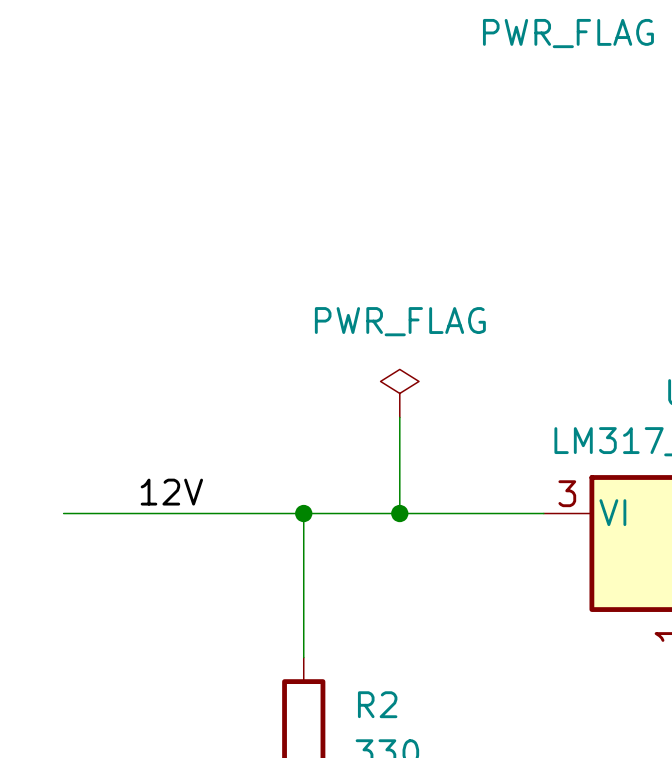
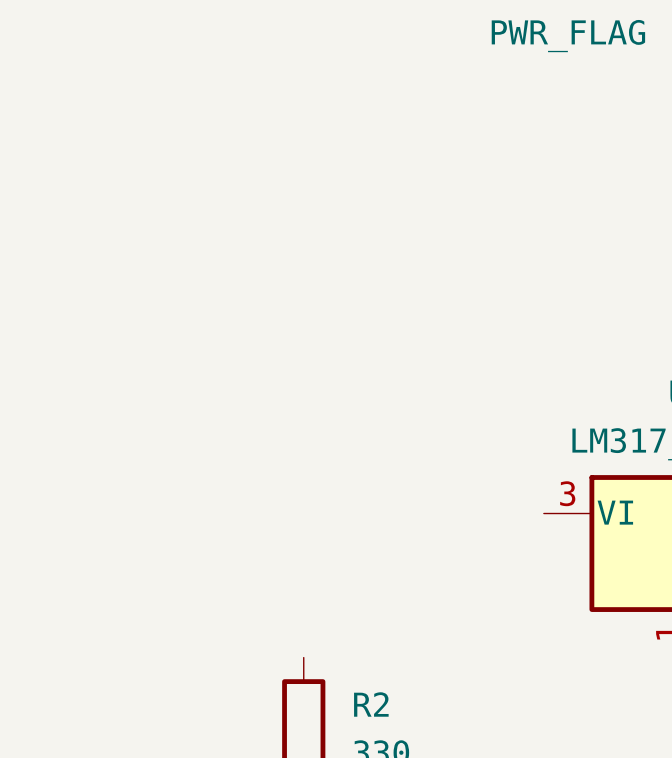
power symbol: PWR_FLAG (399, 393) -> none
wire: (399, 417) (399, 513) -> none
label: 12V (171, 492) -> none
wire: (63, 513) (543, 513) -> none
wire: (303, 513) (303, 657) -> none
junction: (303, 513) -> none
junction: (399, 513) -> none

